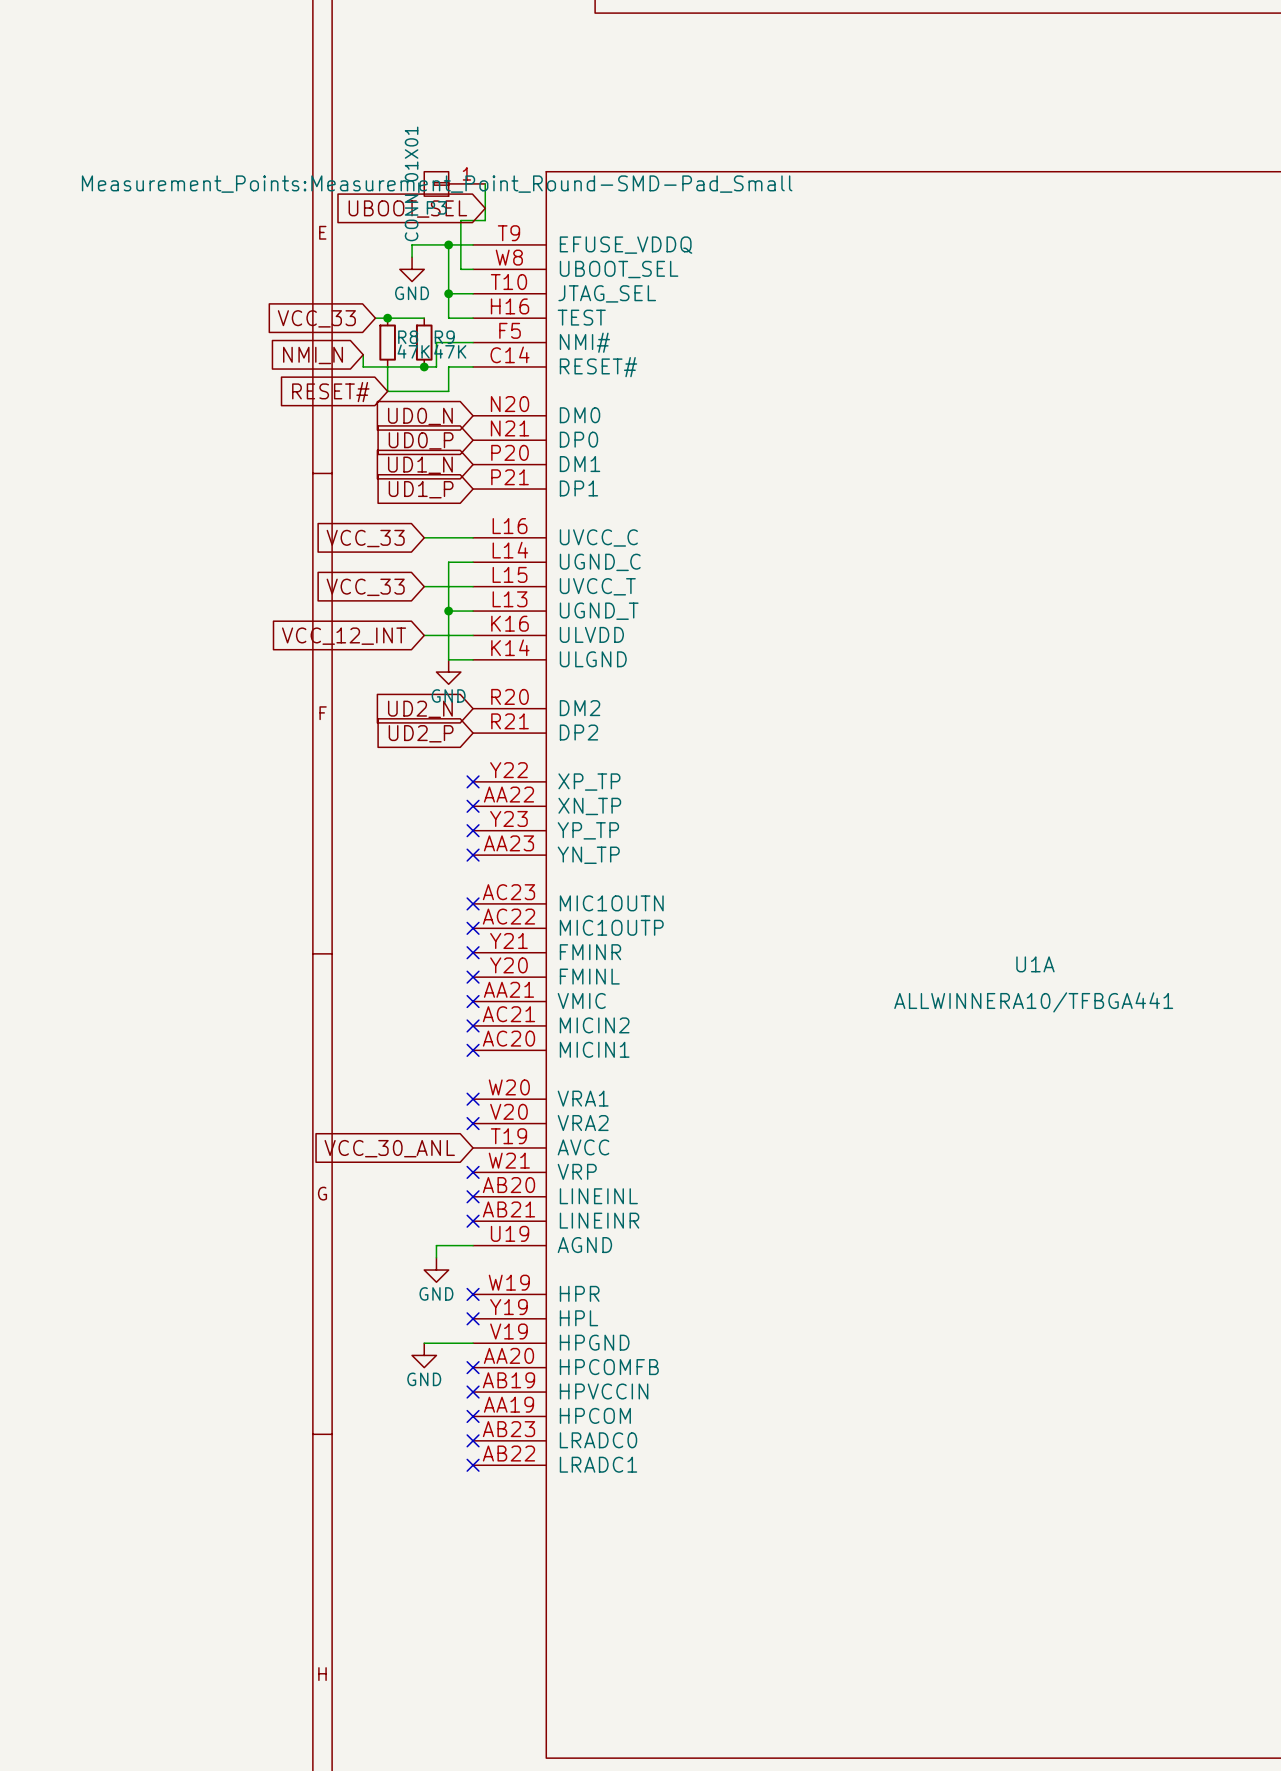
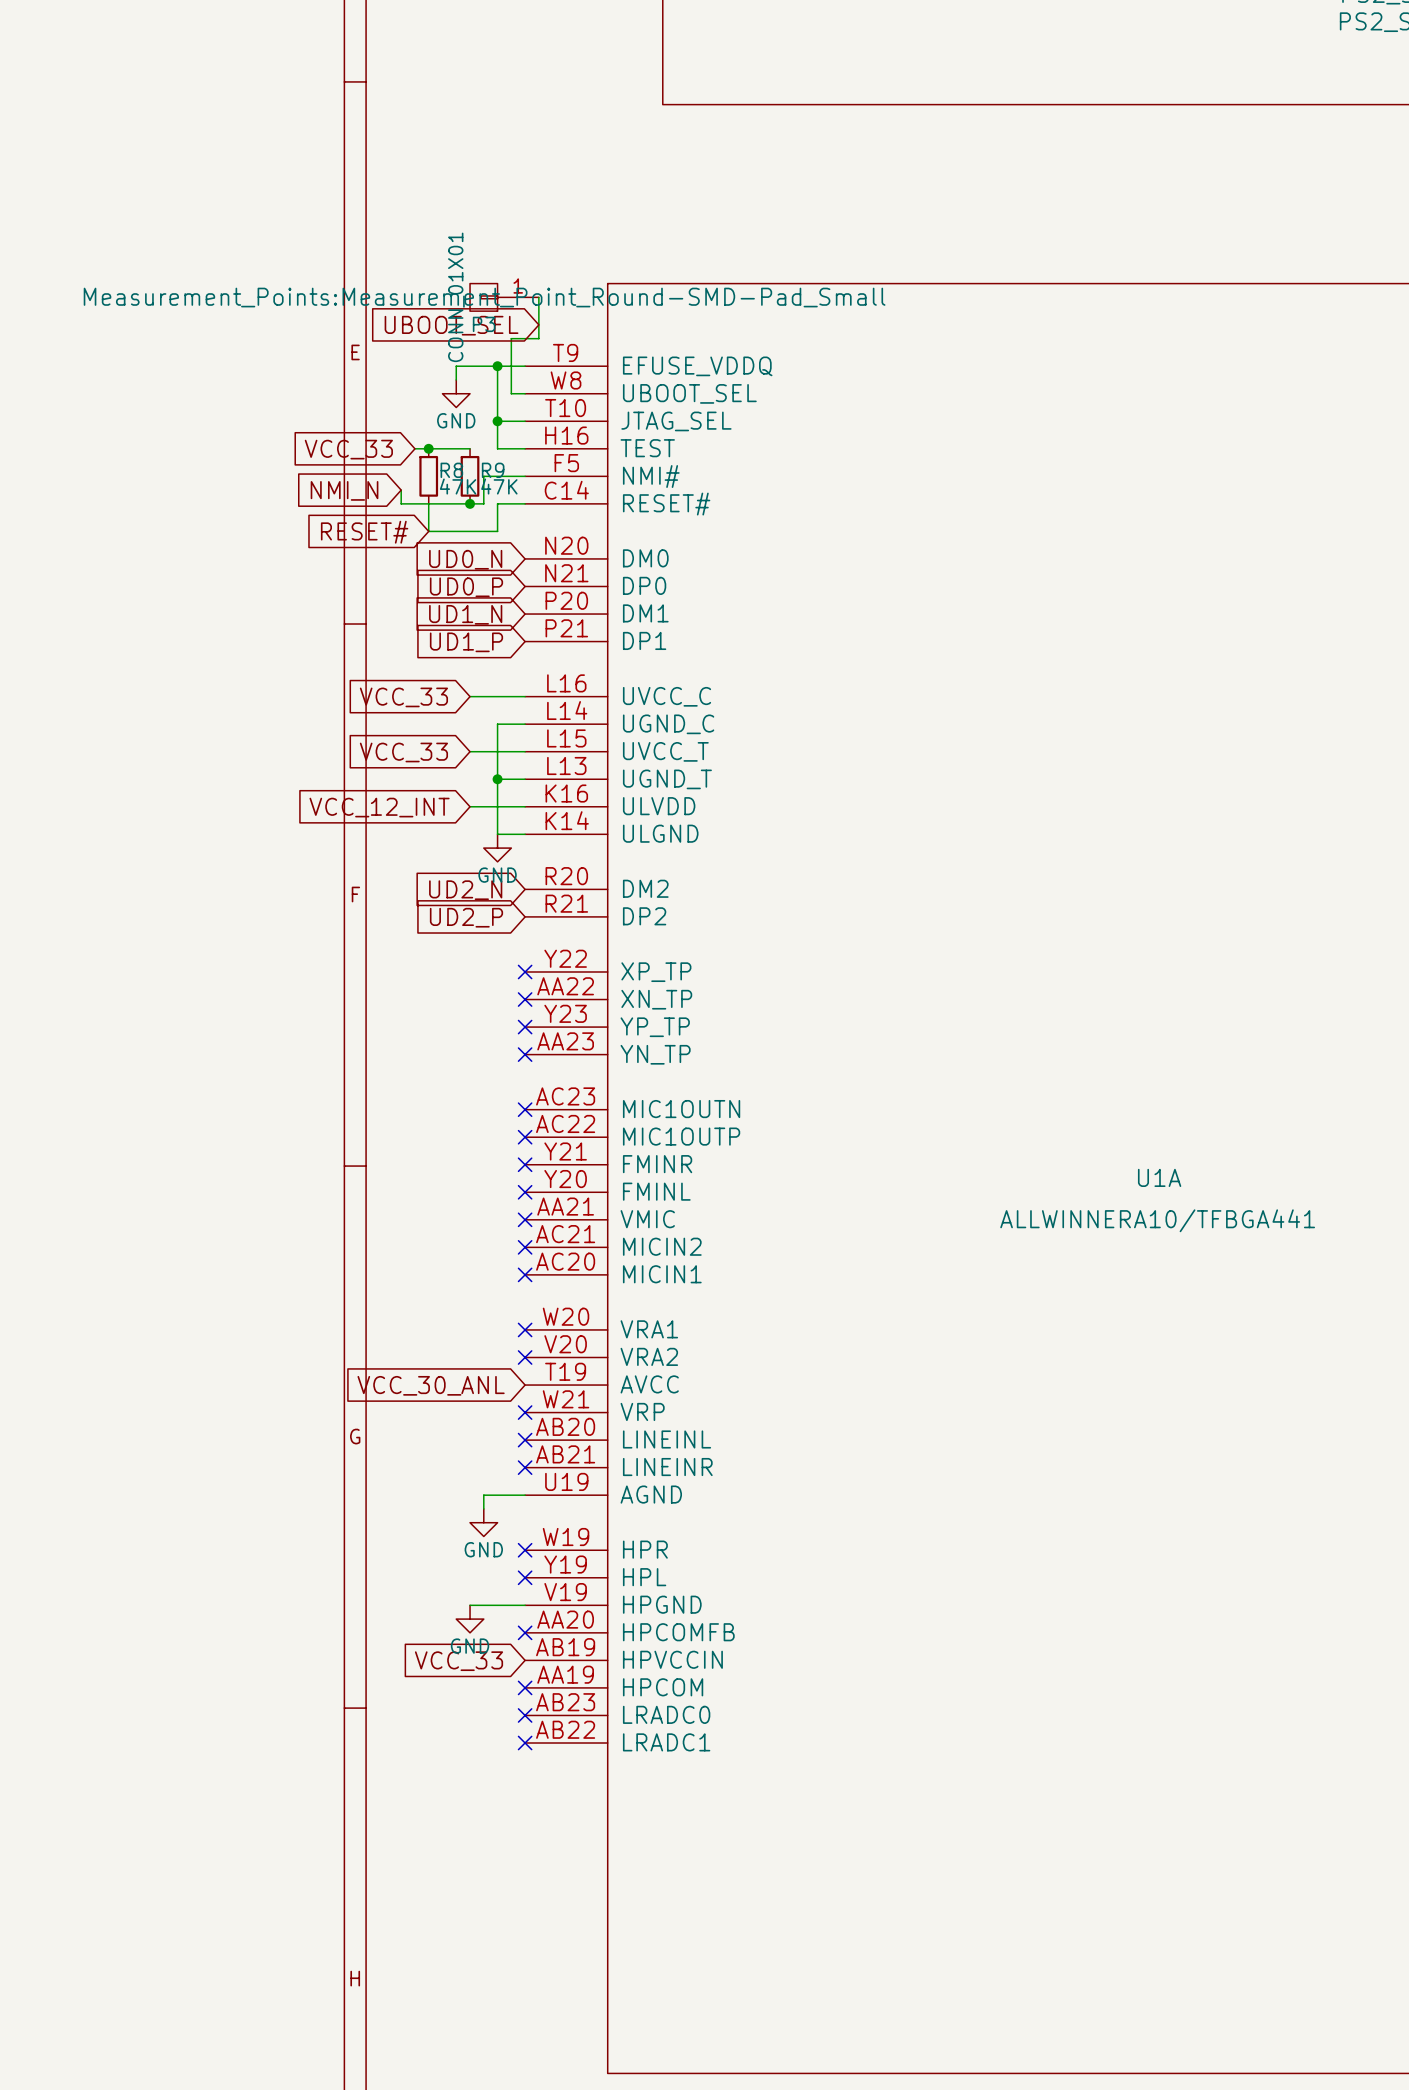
global label: none -> VCC_33 (459, 1661)
no-connect mark: (473, 1392) -> none

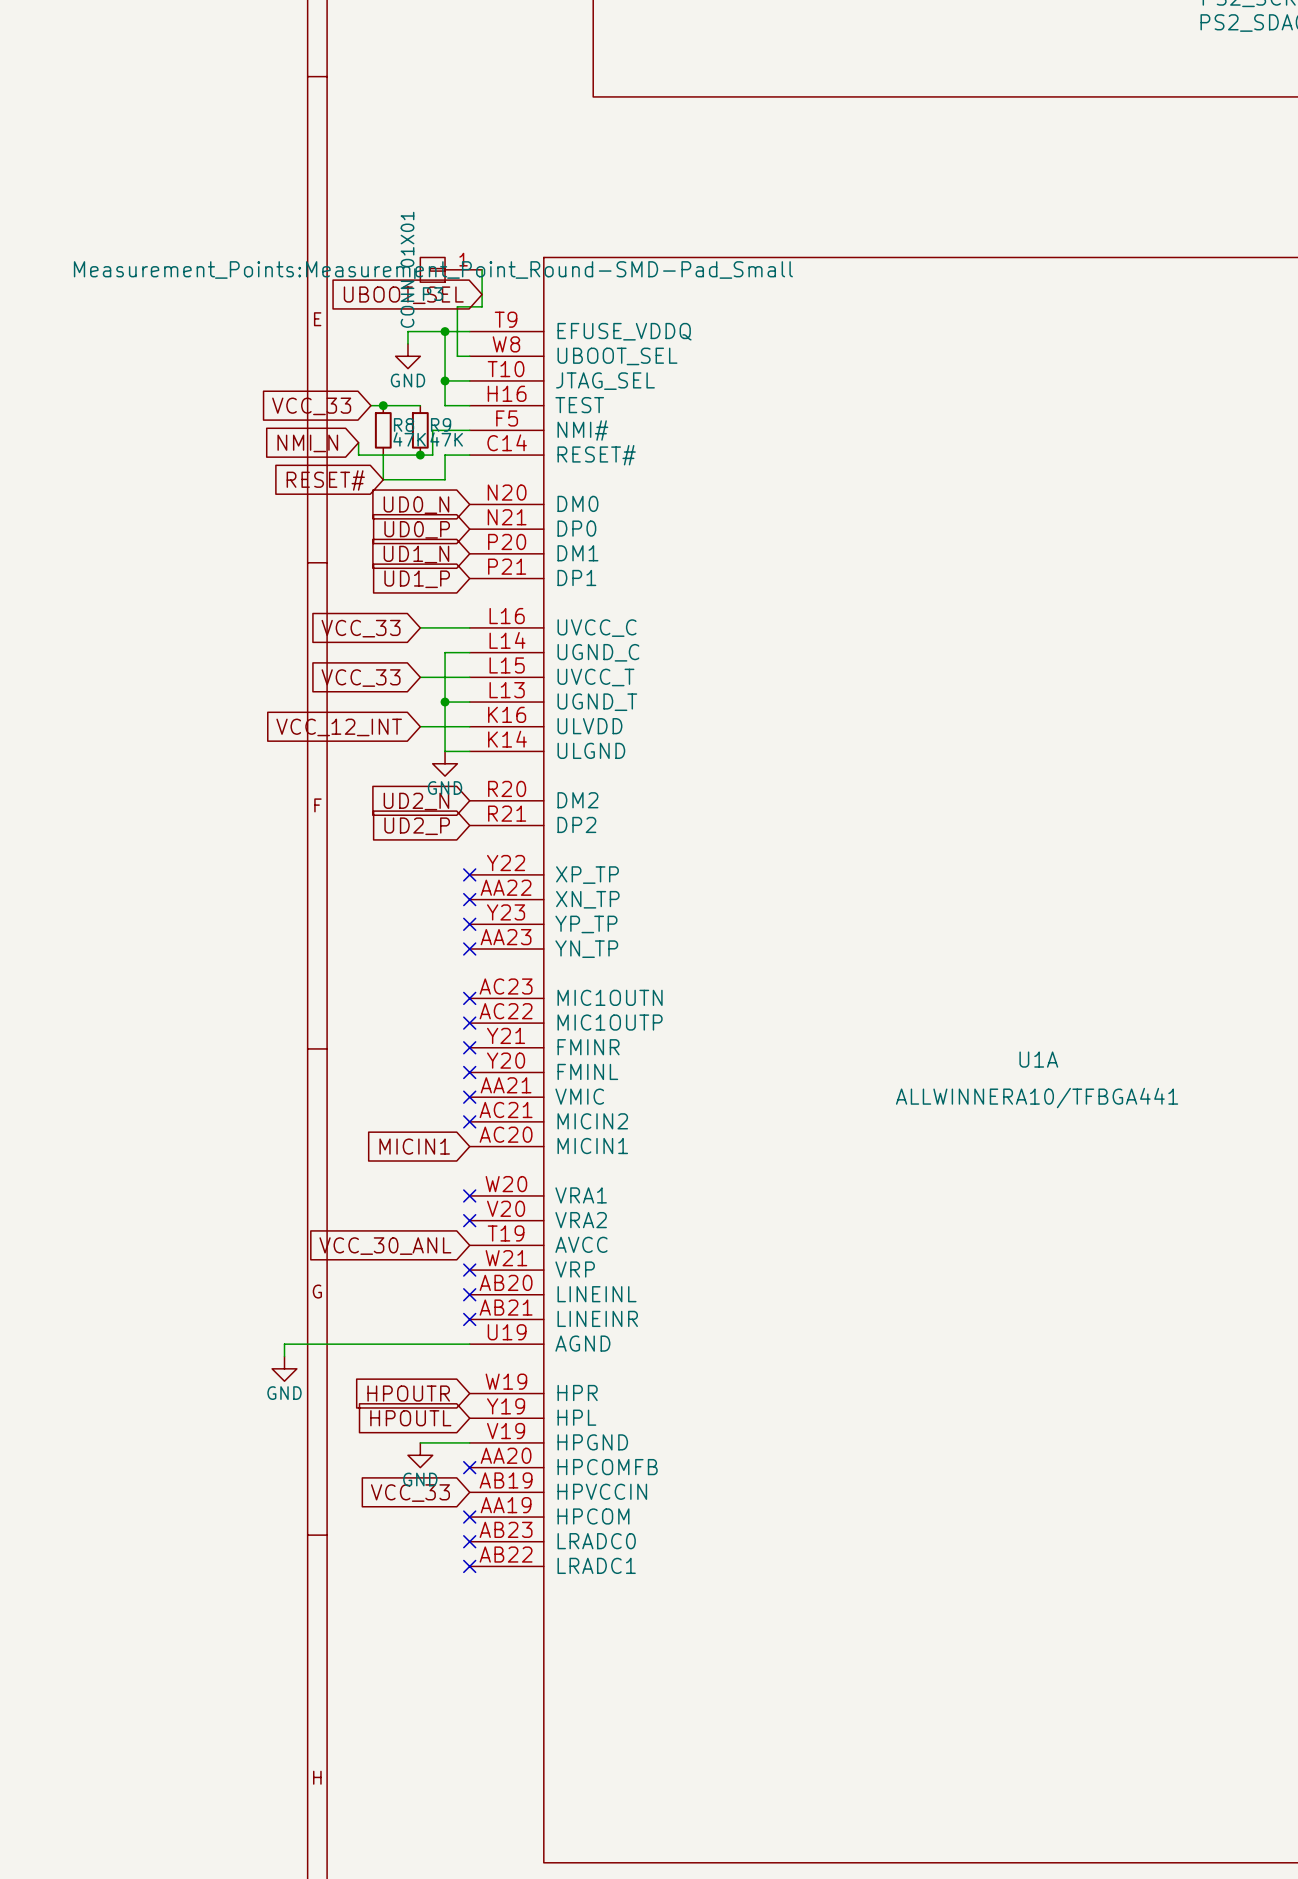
global label: none -> MICIN1 (414, 1146)
no-connect mark: (525, 1274) -> none
wire: (483, 1495) (483, 1508) -> (432, 1344) (284, 1344) (284, 1356)
power symbol position: GND (483, 1522) -> GND (284, 1368)
global label: none -> HPOUTR (408, 1393)
no-connect mark: (525, 1550) -> none
global label: none -> HPOUTL (410, 1418)
no-connect mark: (525, 1577) -> none

